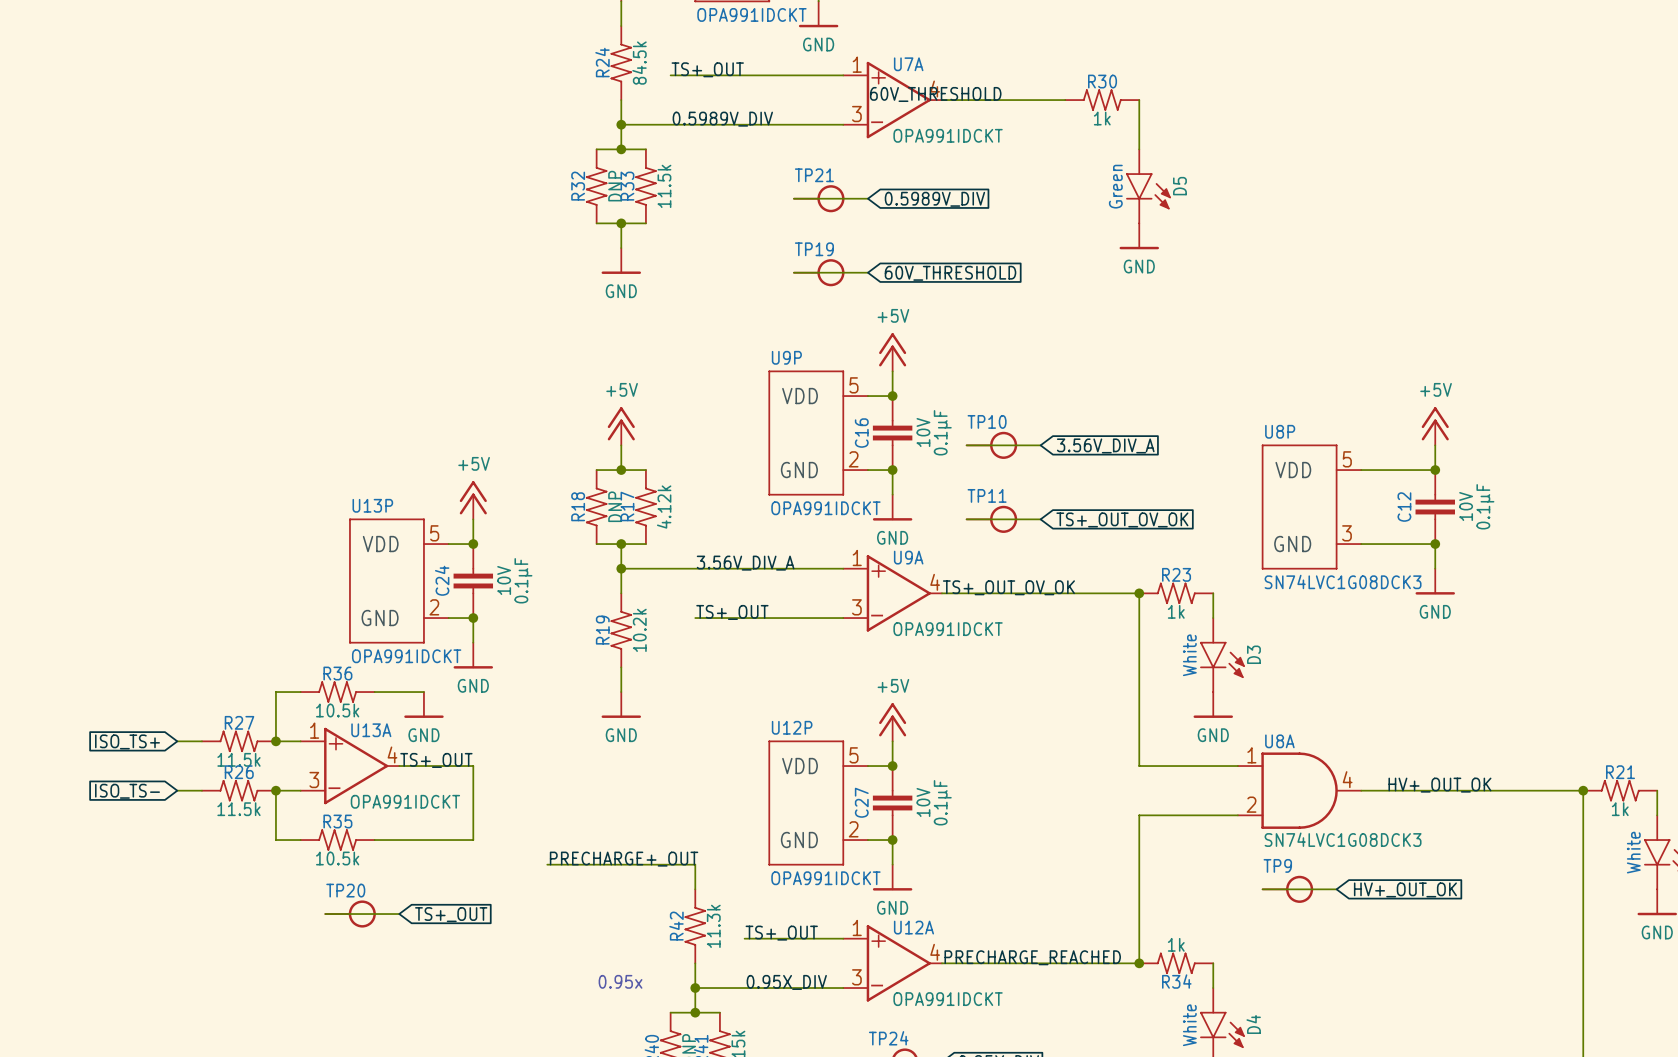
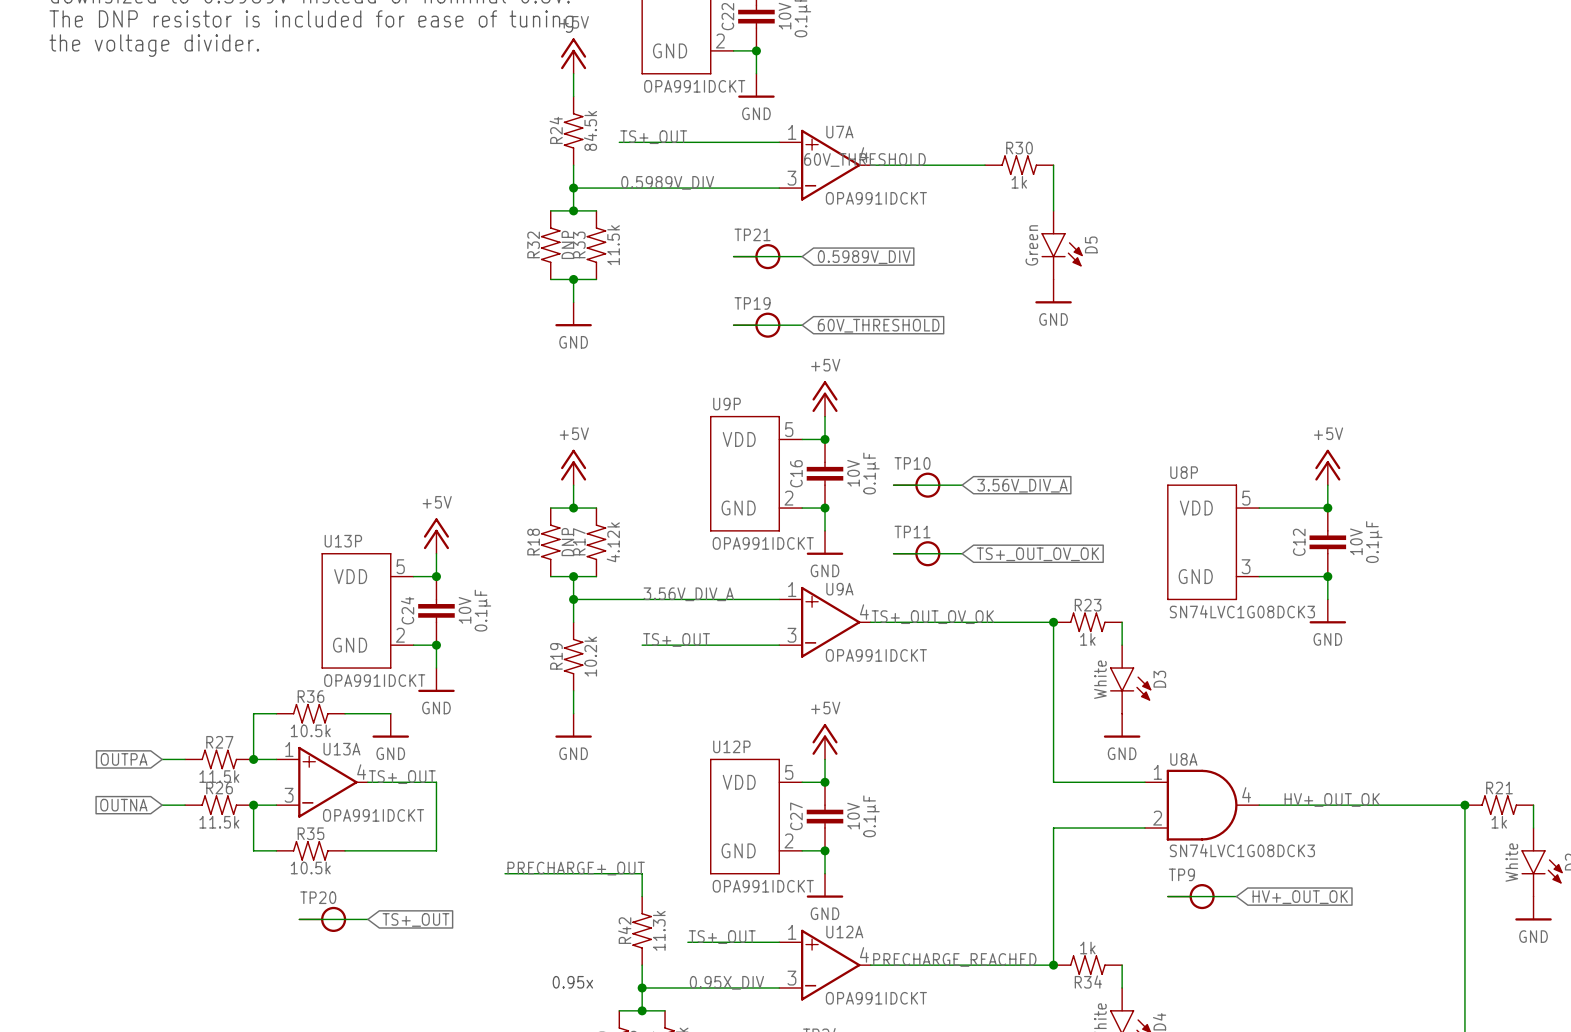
global label: ISO_TS+ (127, 741) -> OUTPA (124, 759)
global label: ISO_TS- (127, 791) -> OUTNA (123, 805)

